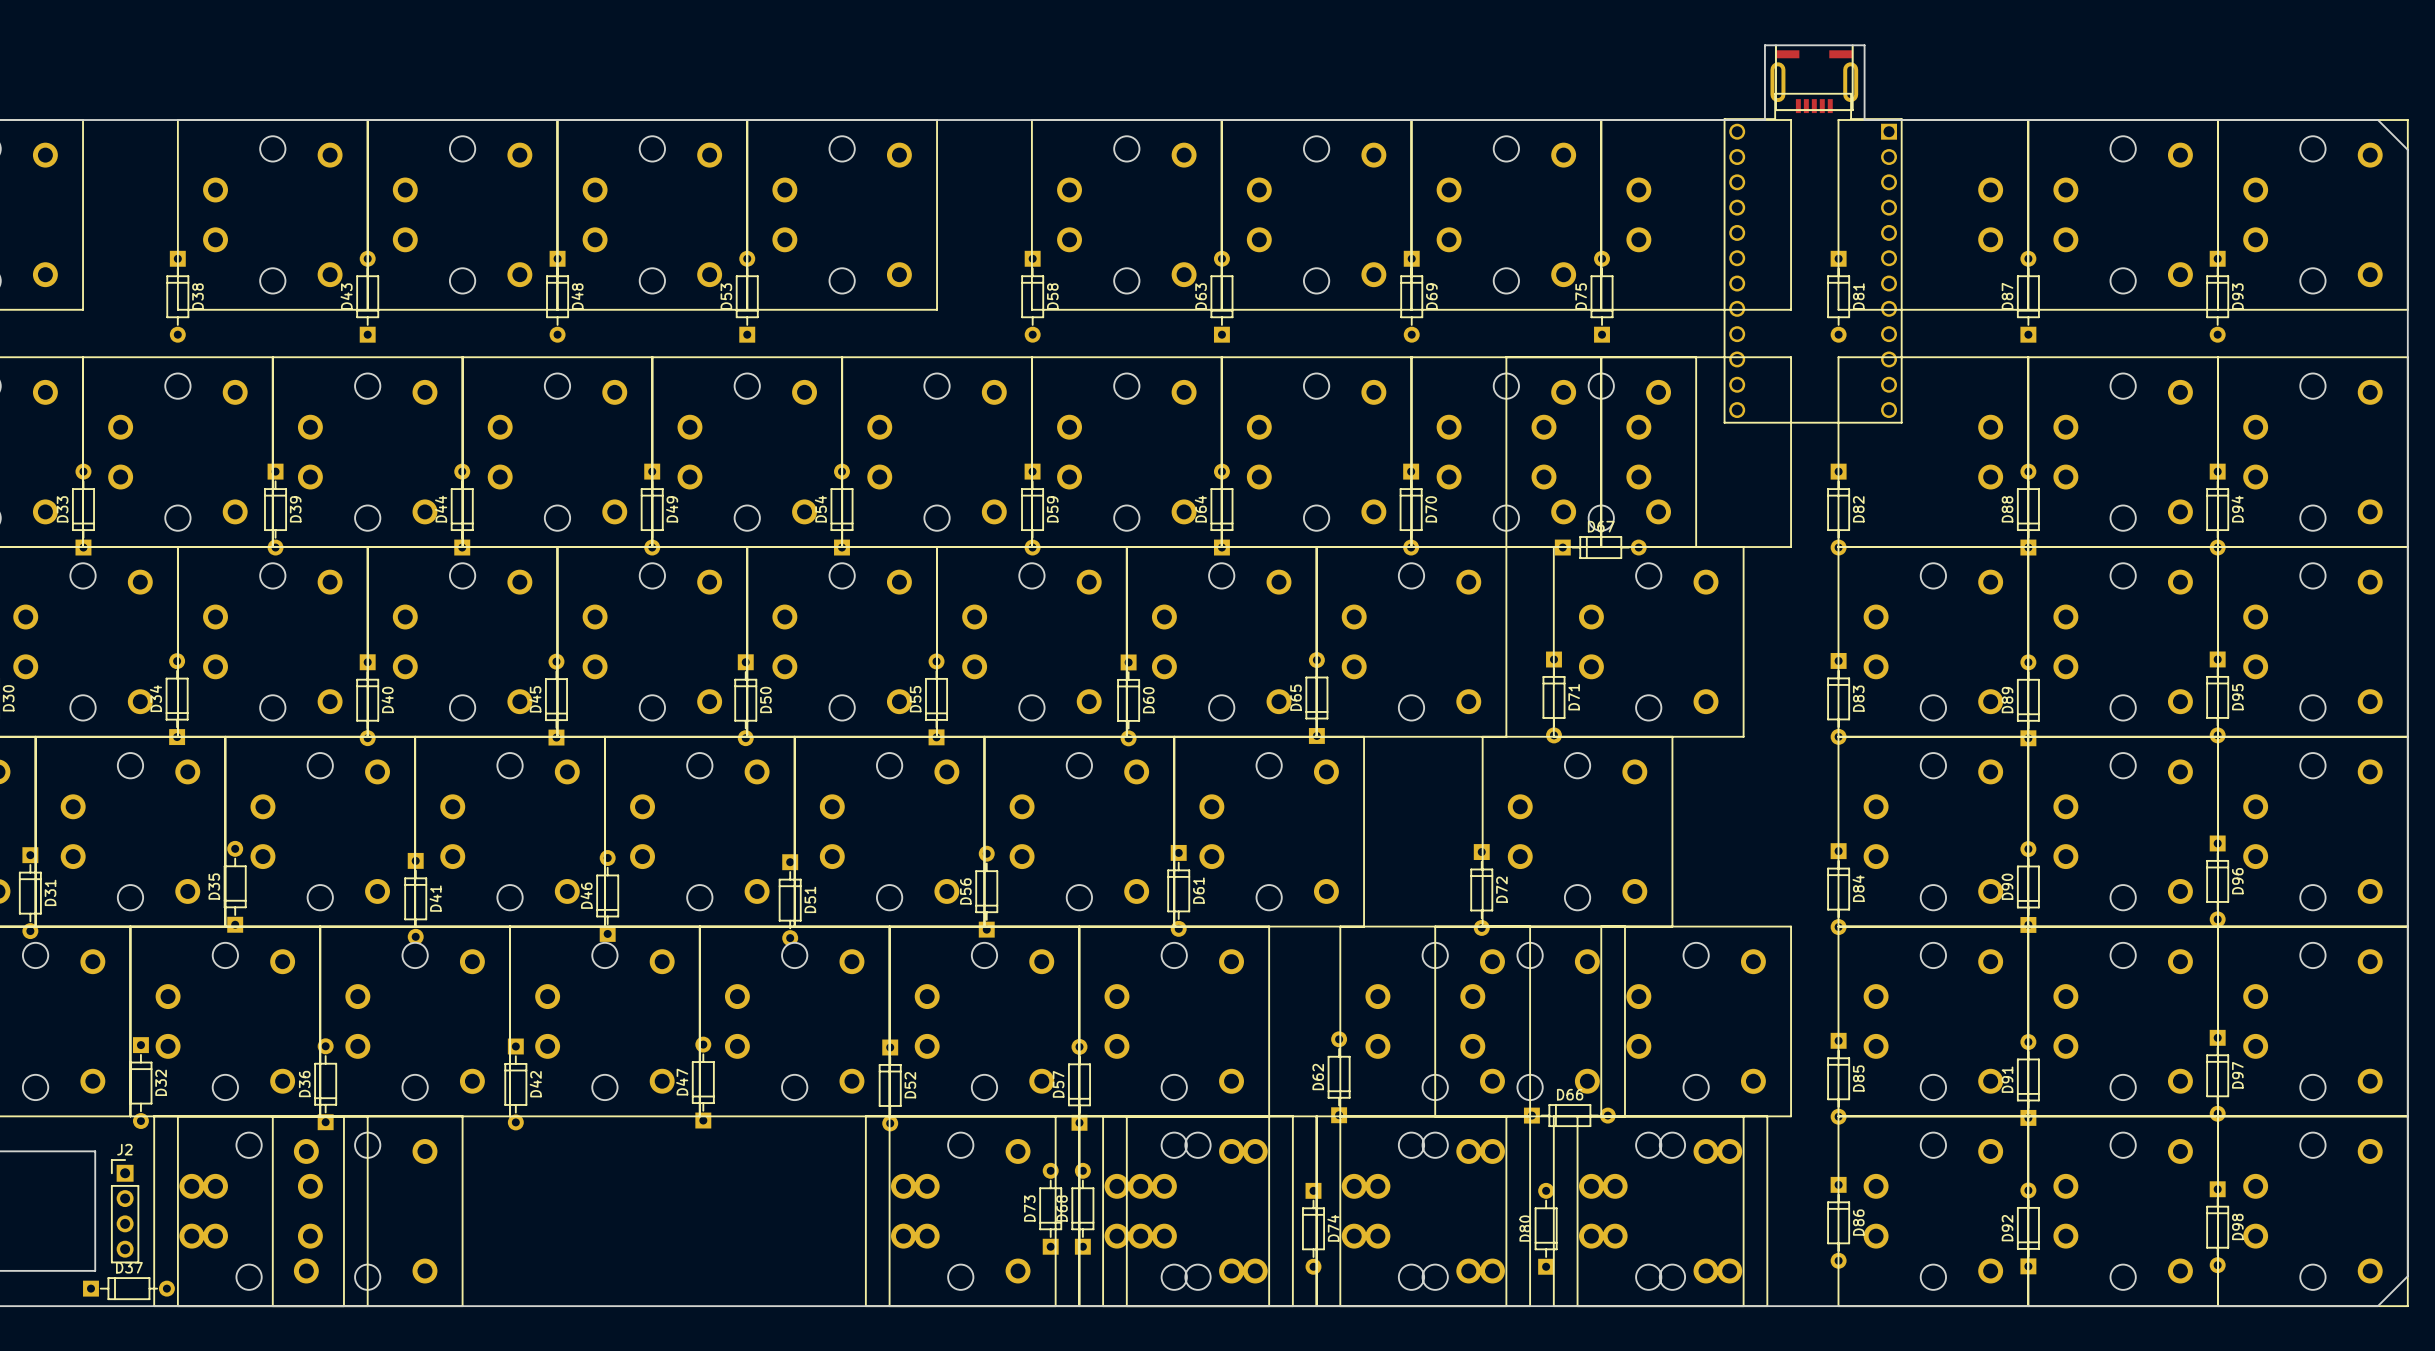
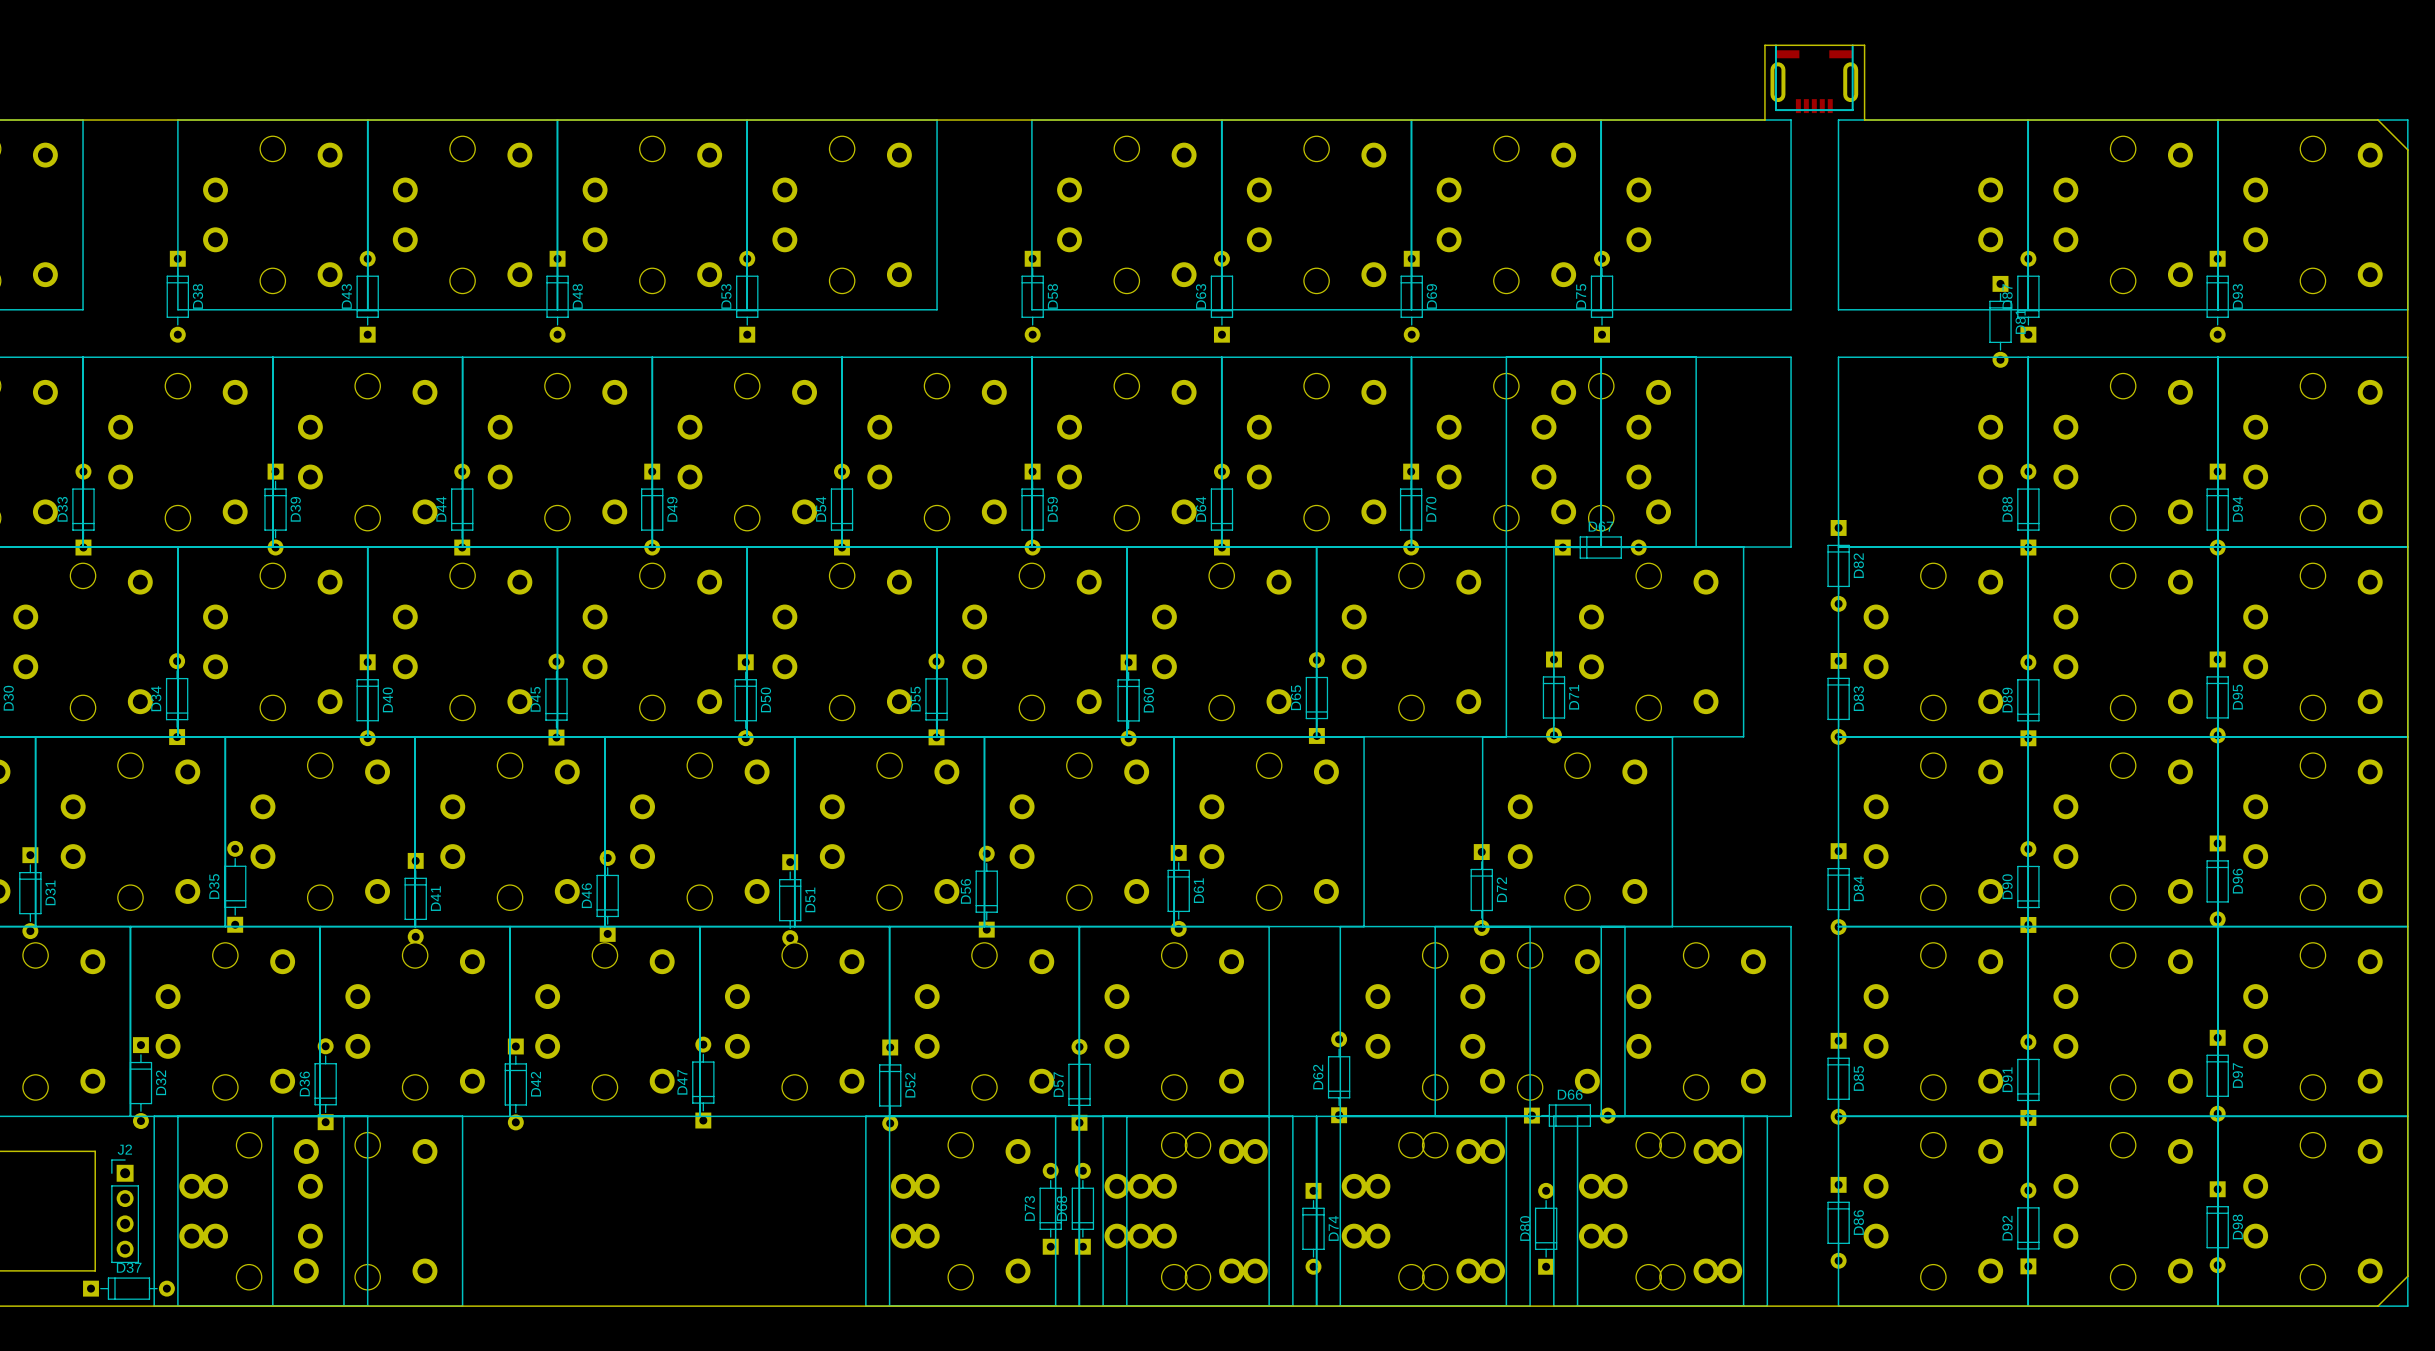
part: (1813, 258) -> none
D81 position: (1838, 296) -> (2000, 321)
D82 position: (1838, 509) -> (1838, 565)

